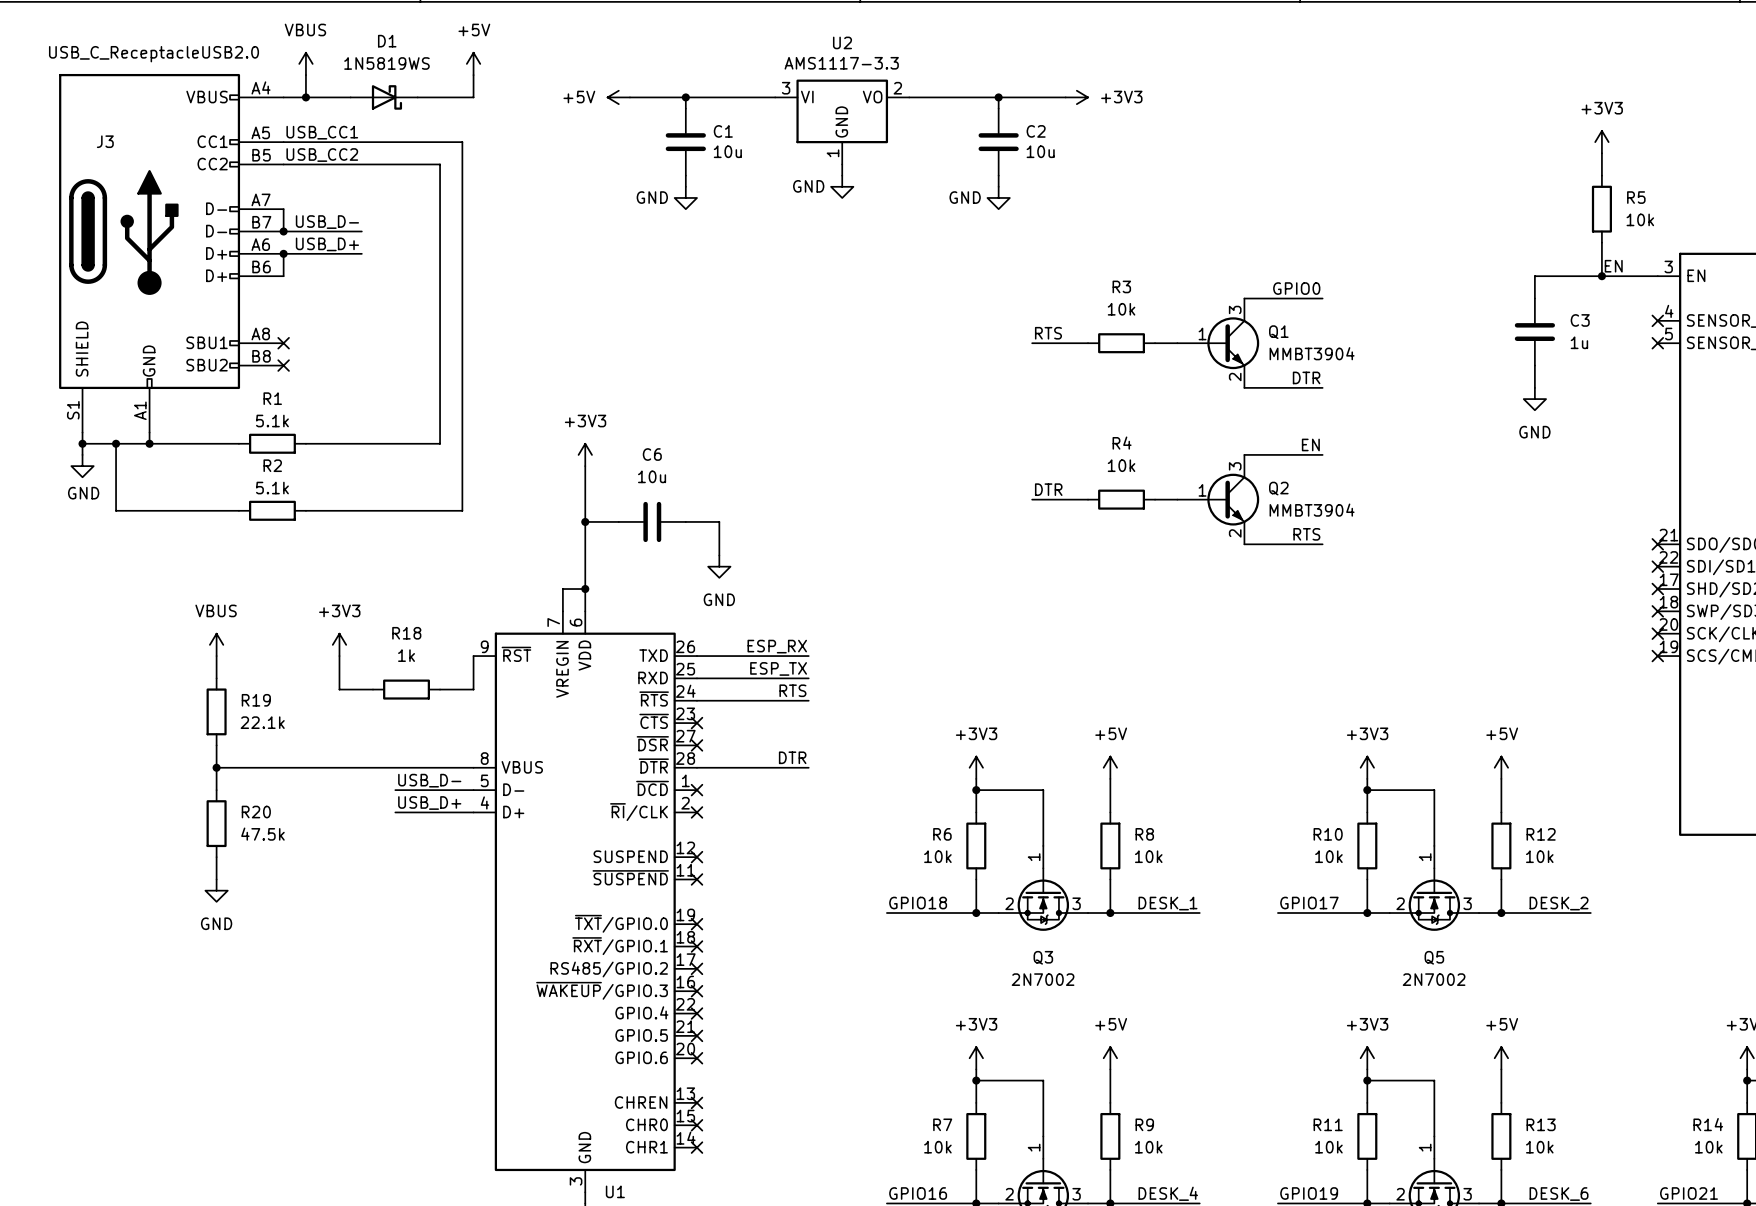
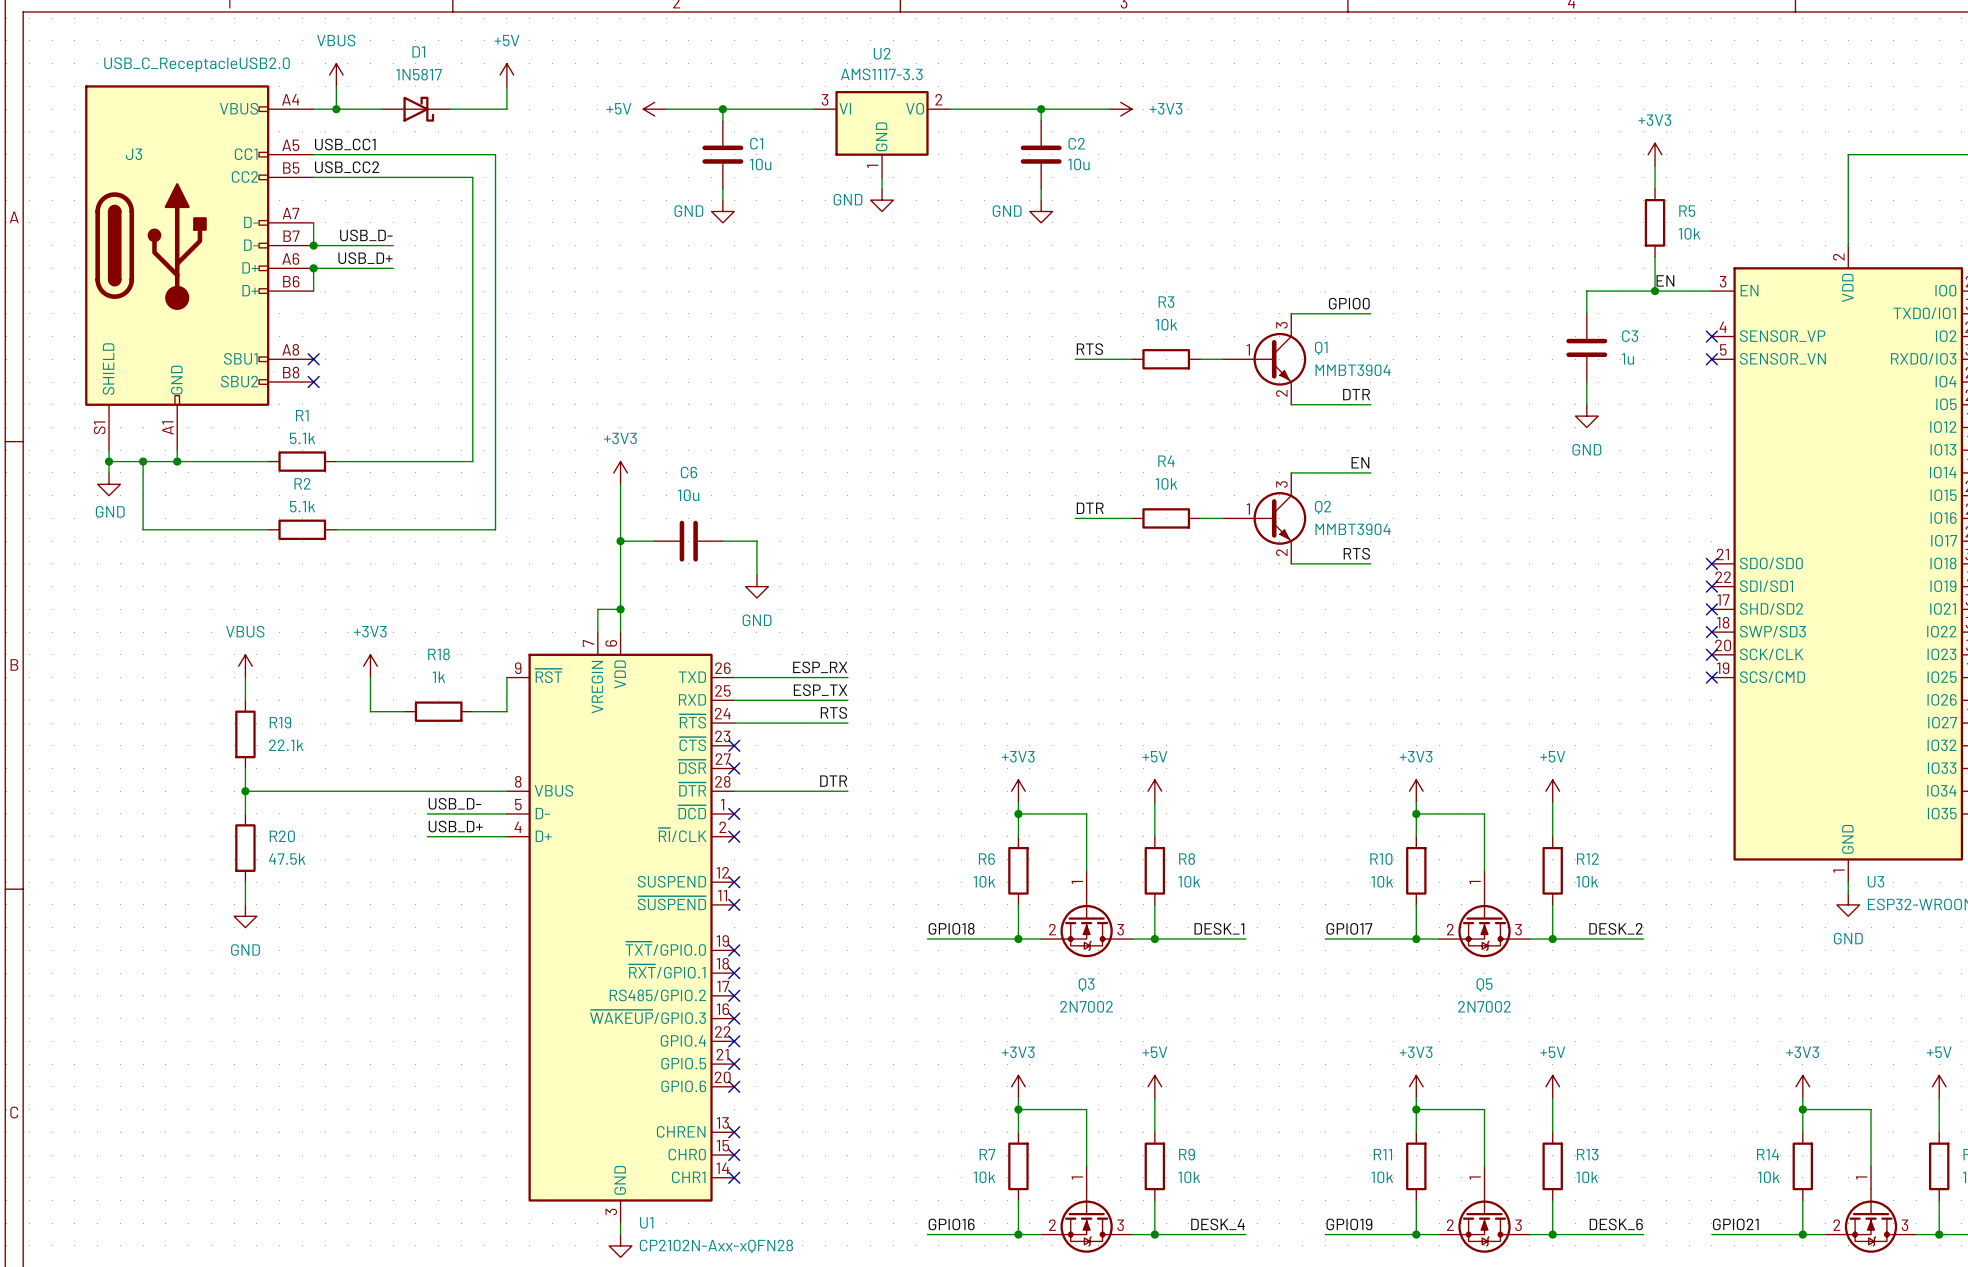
D1 value: 1N5819WS (386, 63) -> 1N5817 (419, 74)

